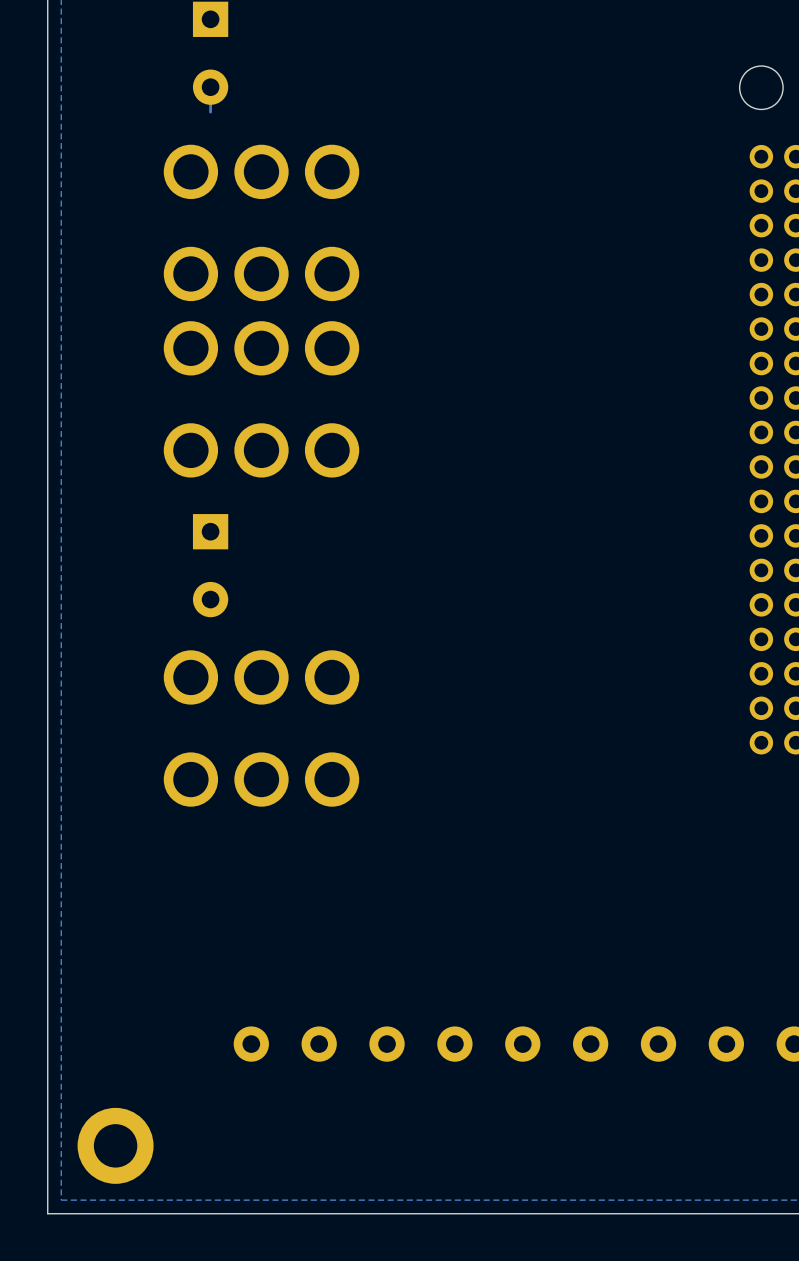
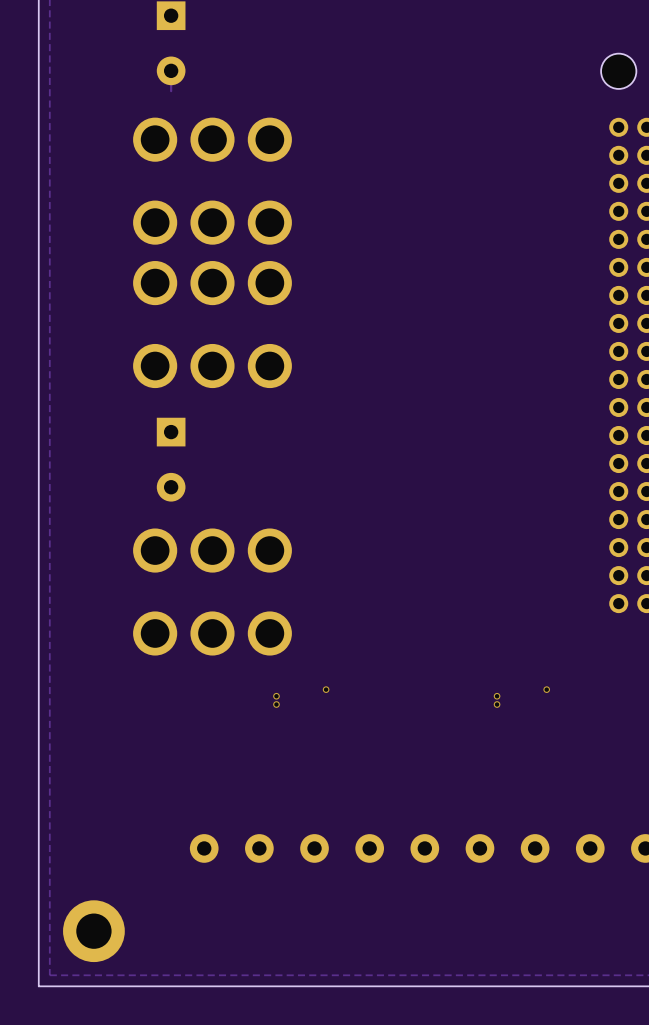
via: none -> (326, 689)
via: none -> (546, 689)
via: none -> (276, 696)
via: none -> (497, 696)
via: none -> (276, 704)
via: none -> (497, 704)

